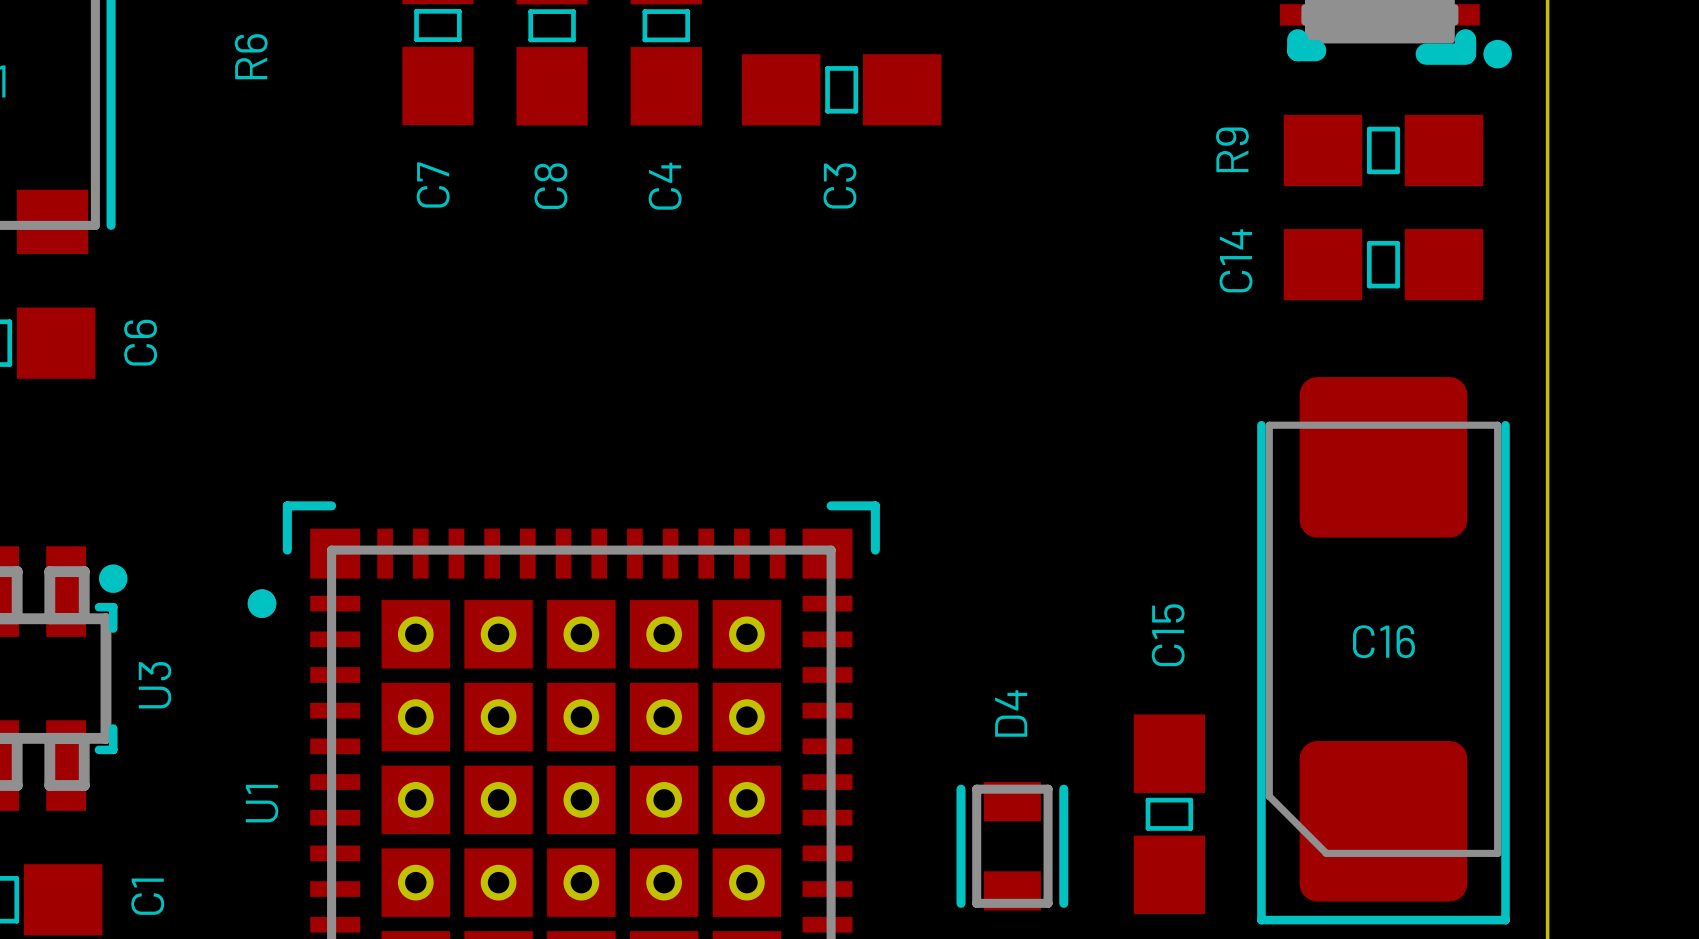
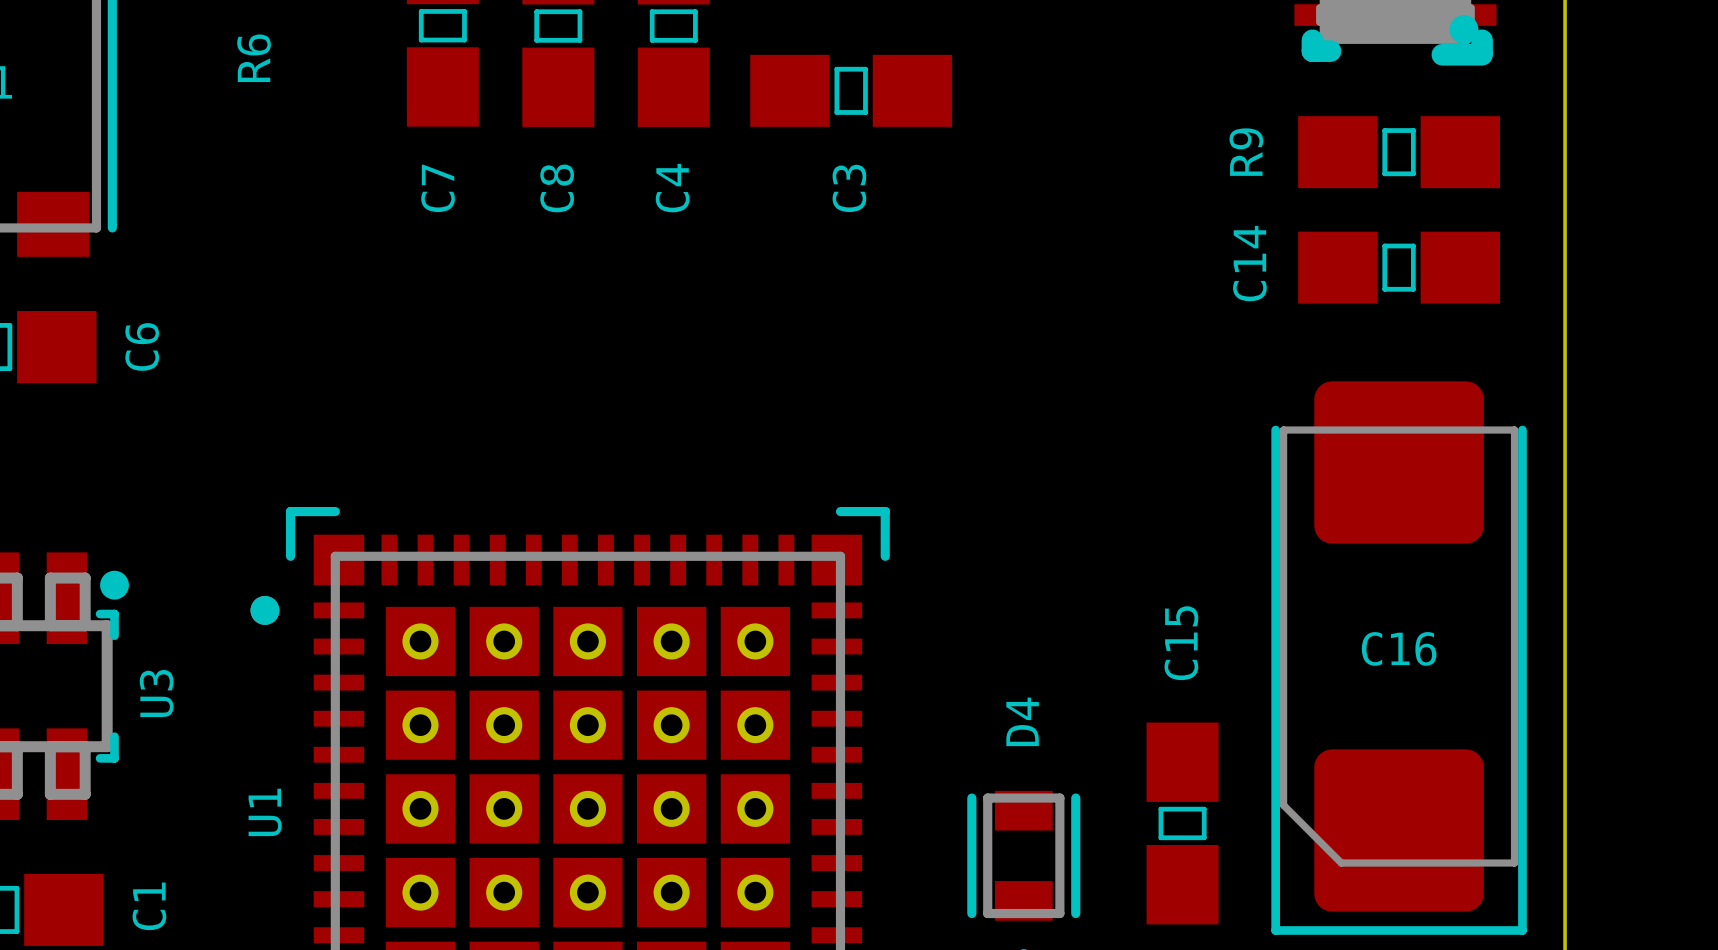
drawing position: (1497, 54) -> (1464, 29)

